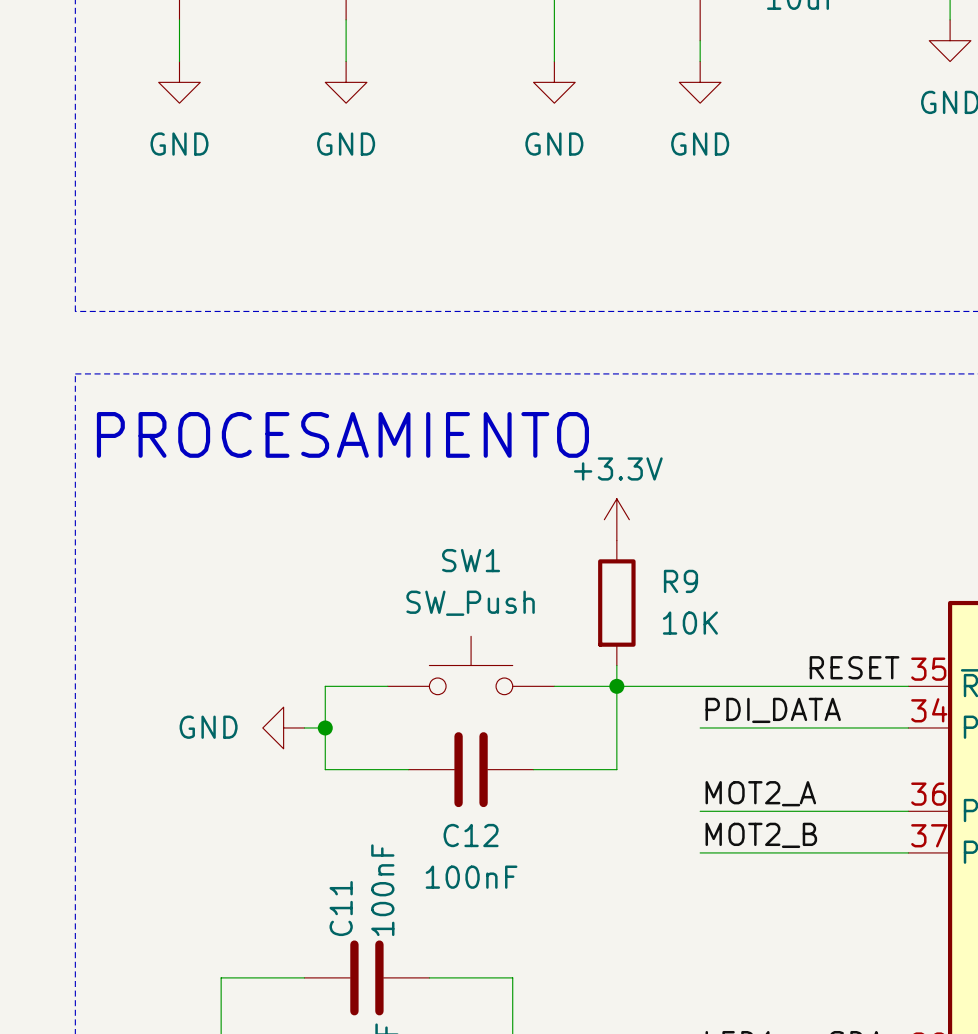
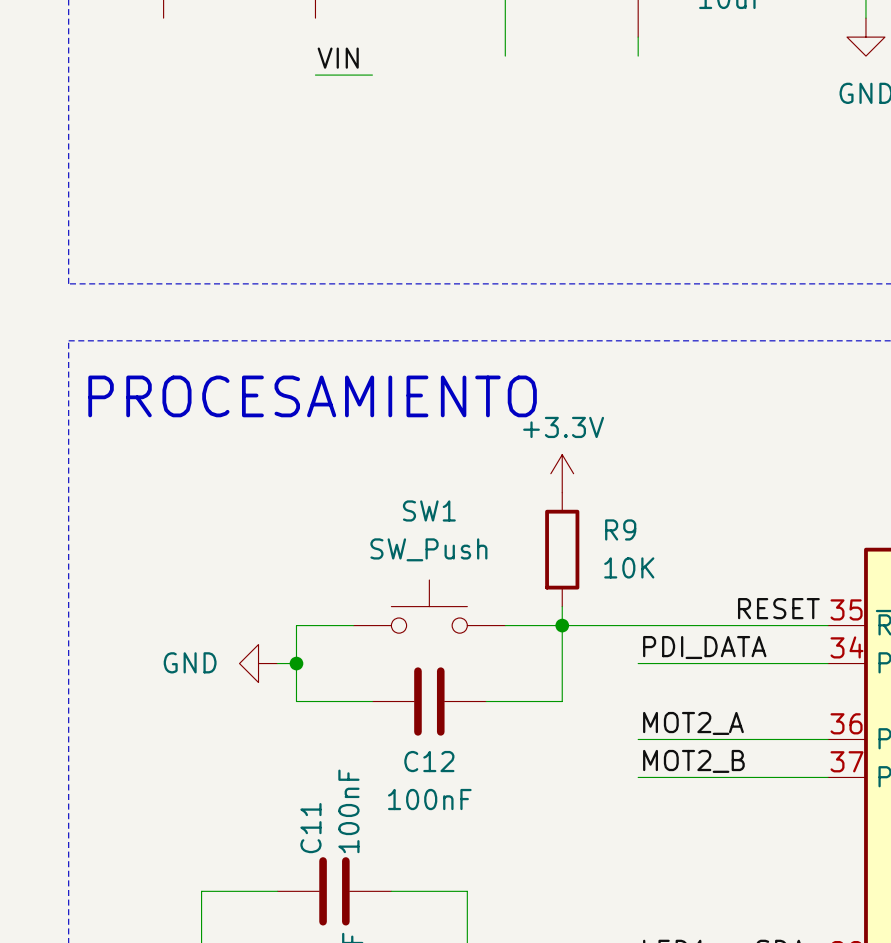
wire: (179, 19) (179, 61) -> none
wire: (346, 19) (346, 61) -> none
label: none -> VIN (338, 58)
power symbol: GND (179, 82) -> none
wire: none -> (315, 75) (372, 75)
power symbol: GND (346, 82) -> none
power symbol: GND (554, 82) -> none
power symbol: GND (700, 82) -> none

